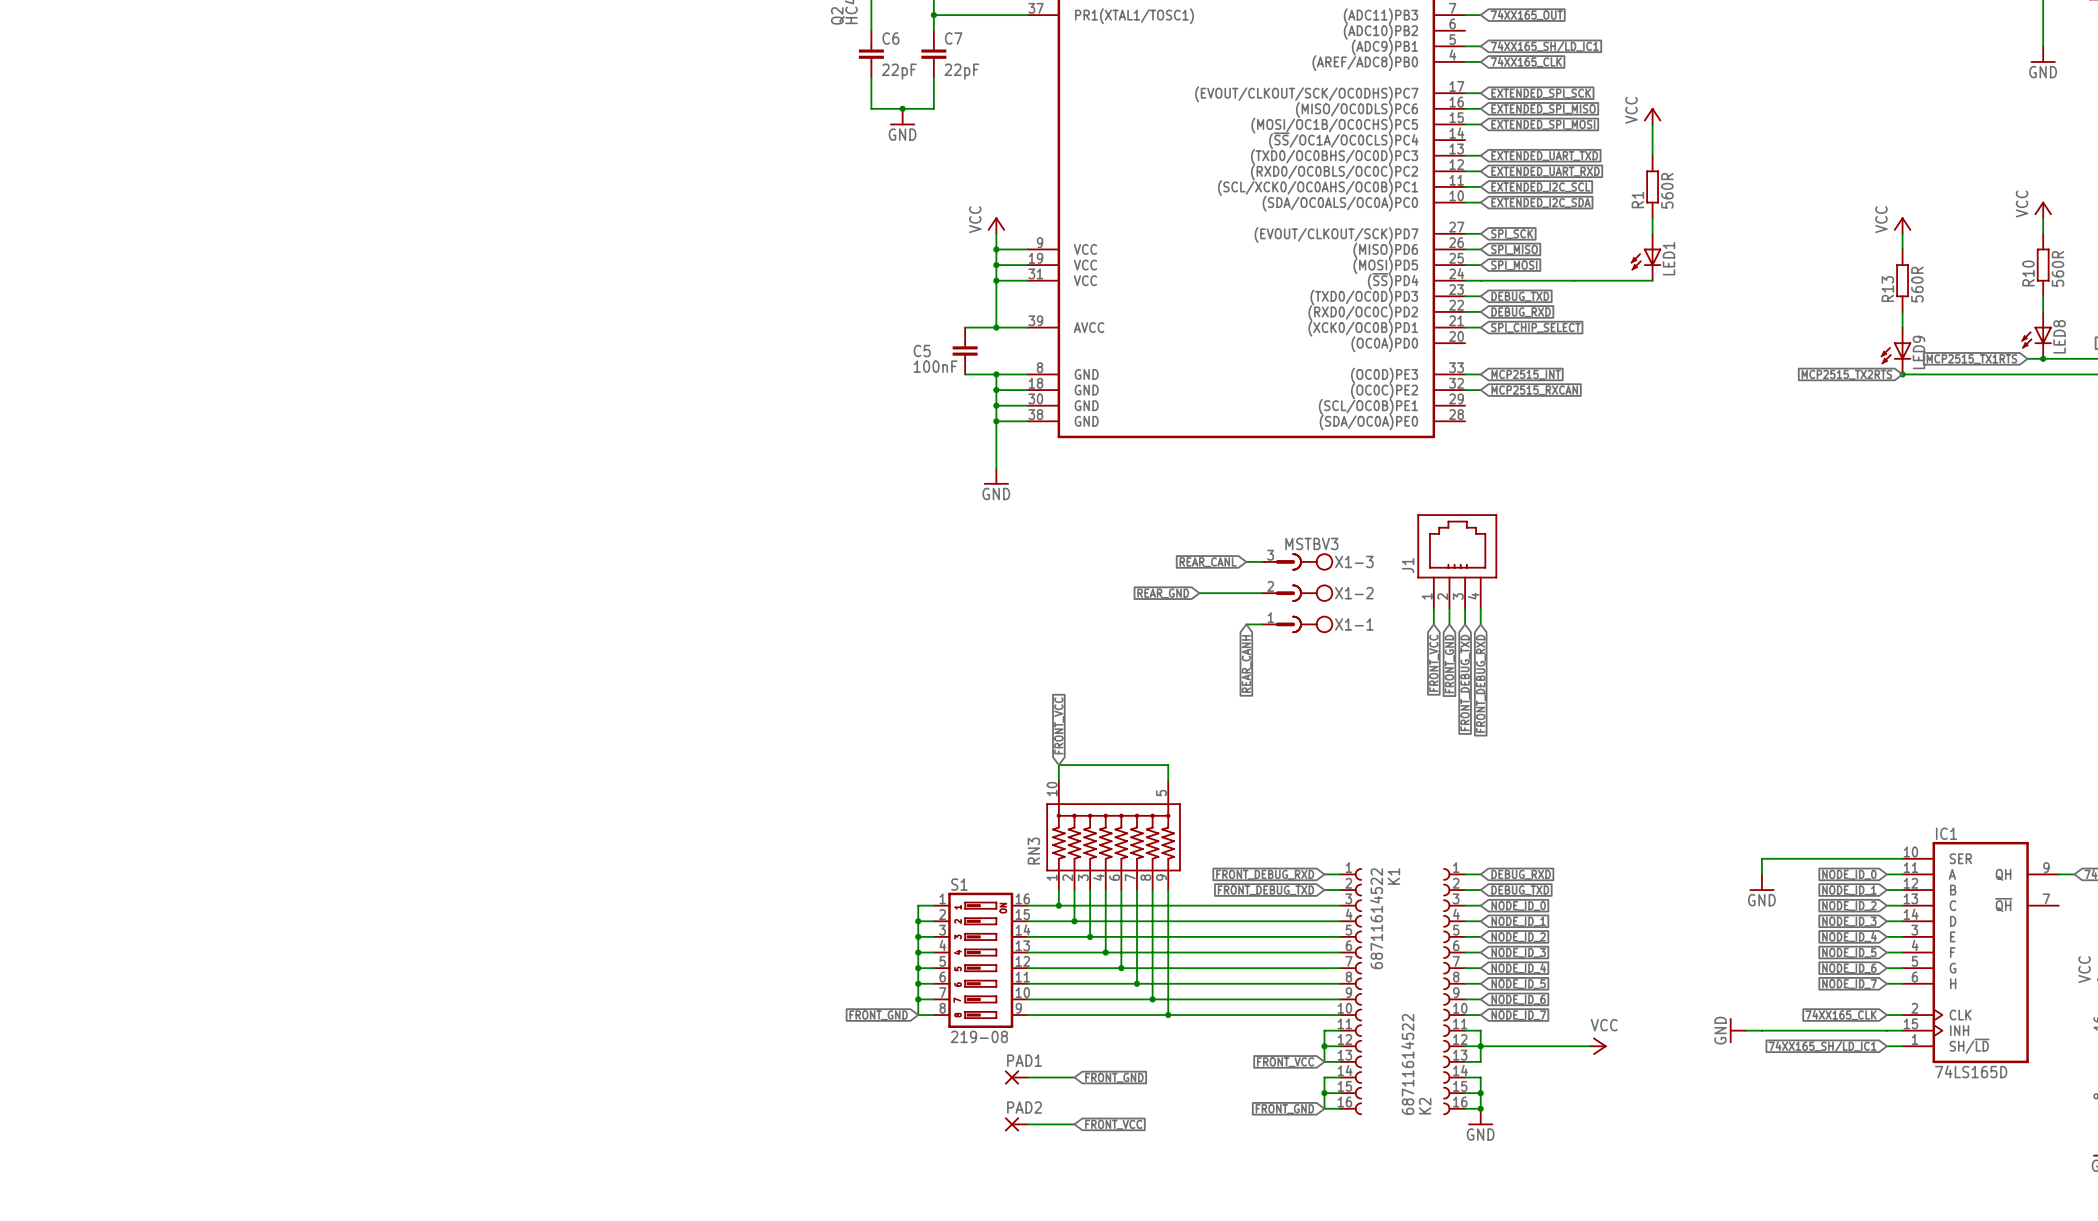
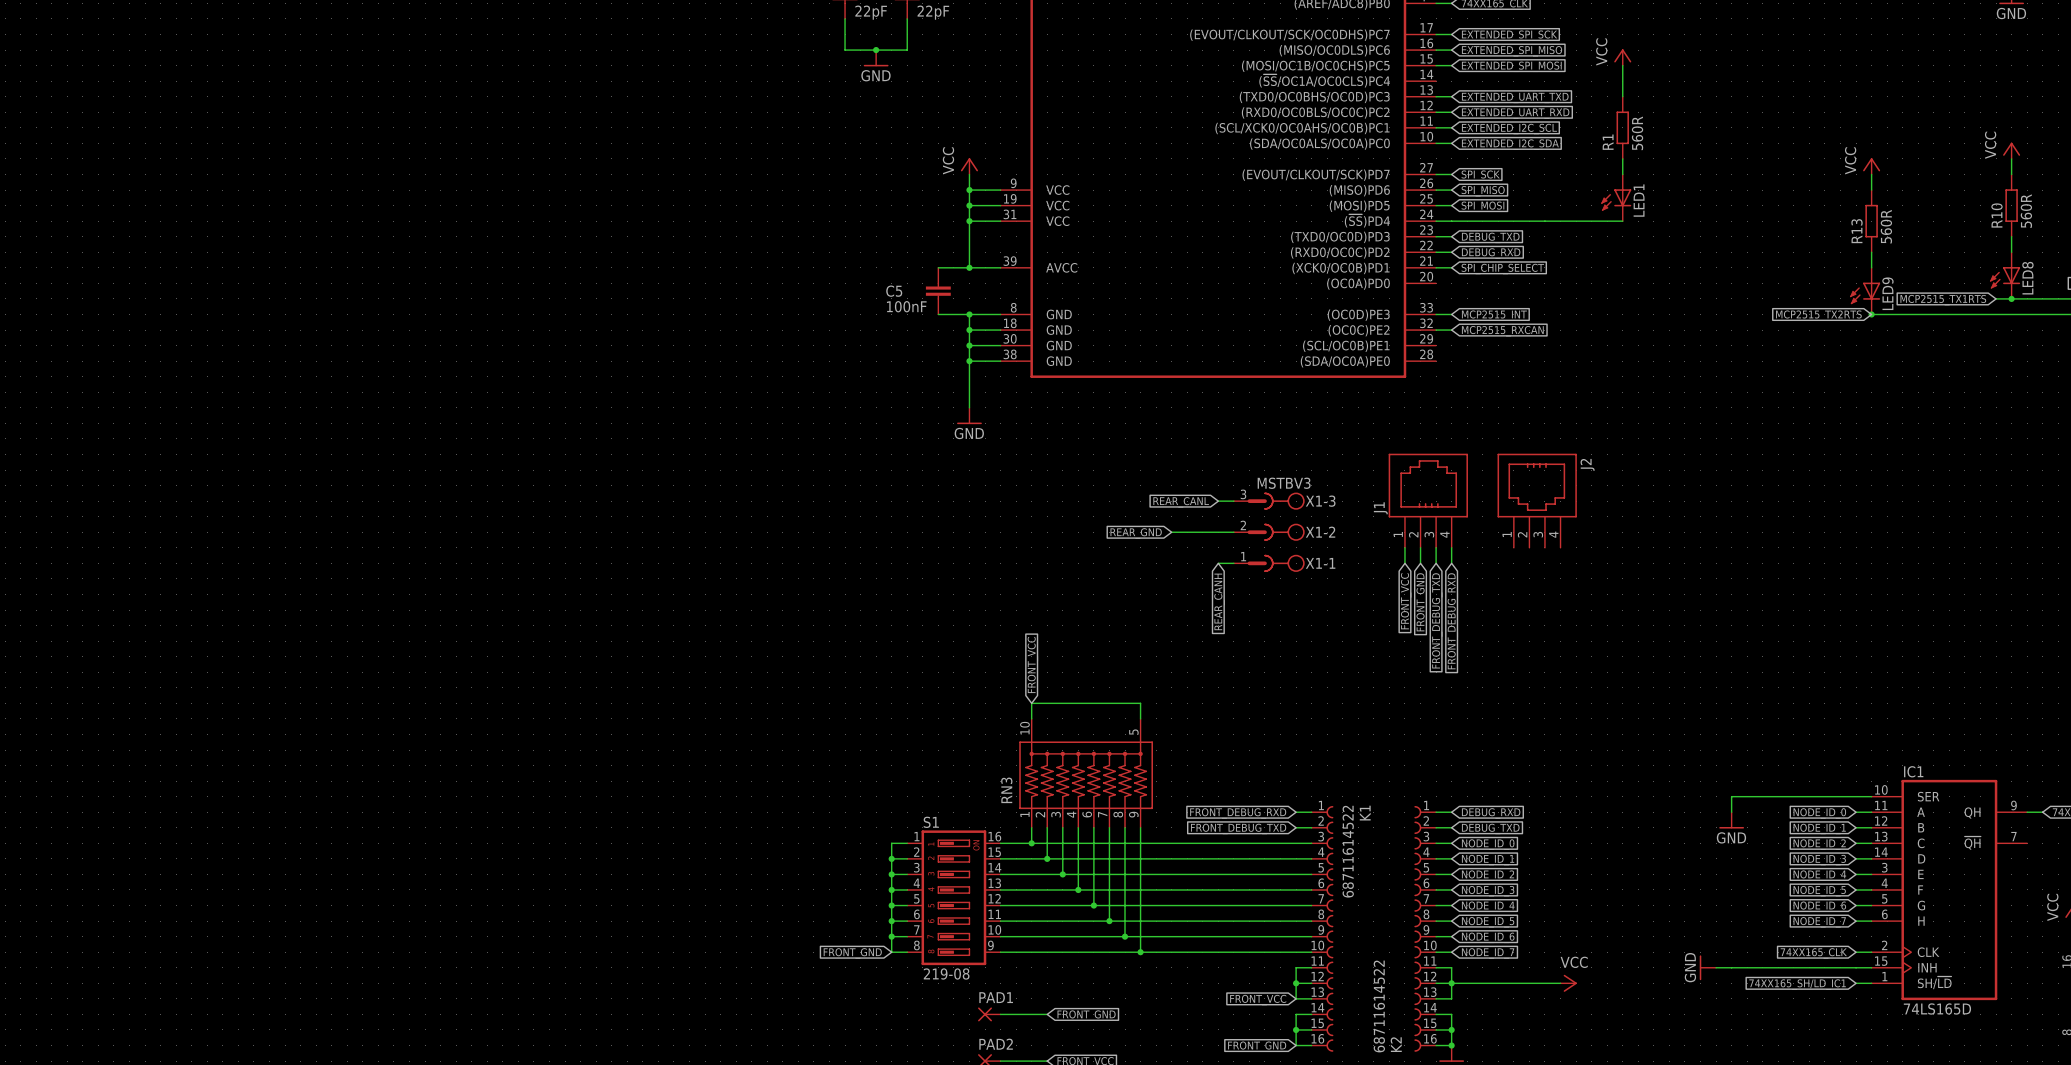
J2: none -> (1537, 500)

